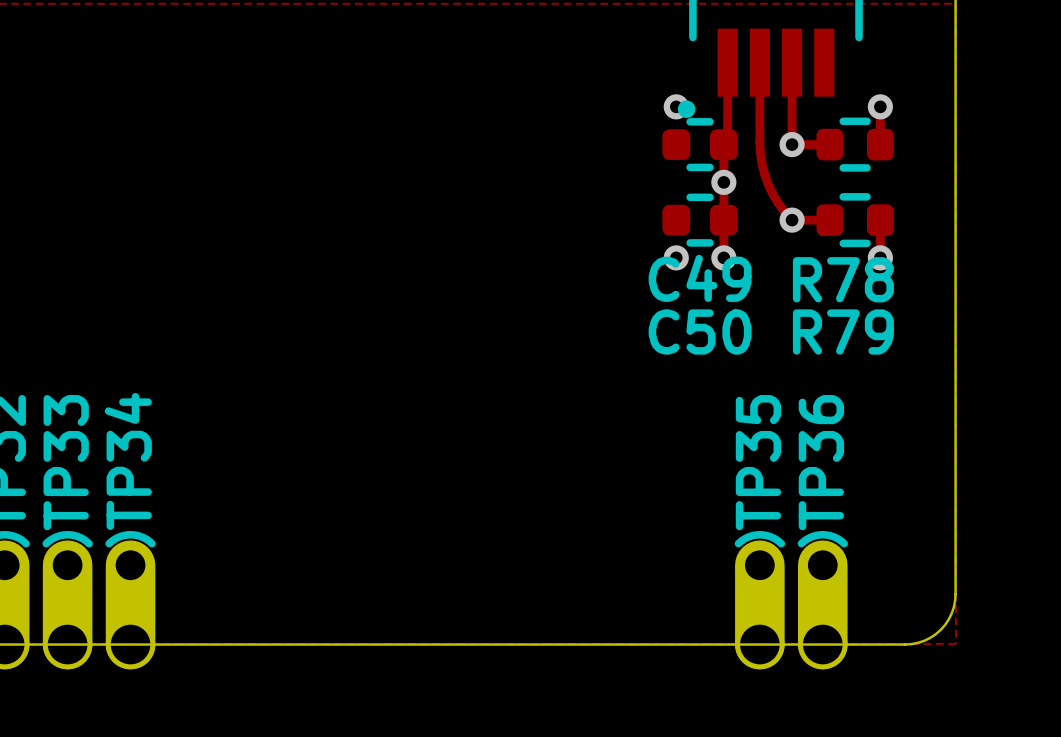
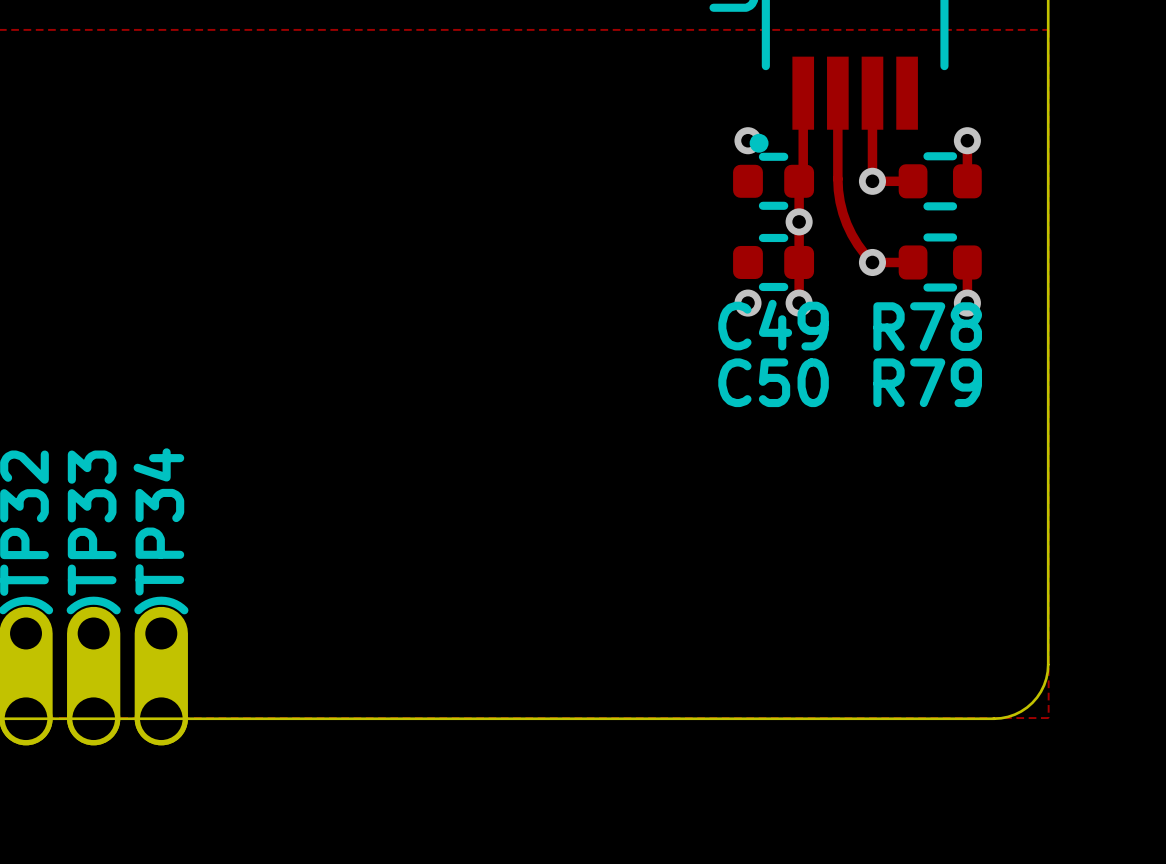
TP35: (759, 600) -> none
TP36: (822, 600) -> none

